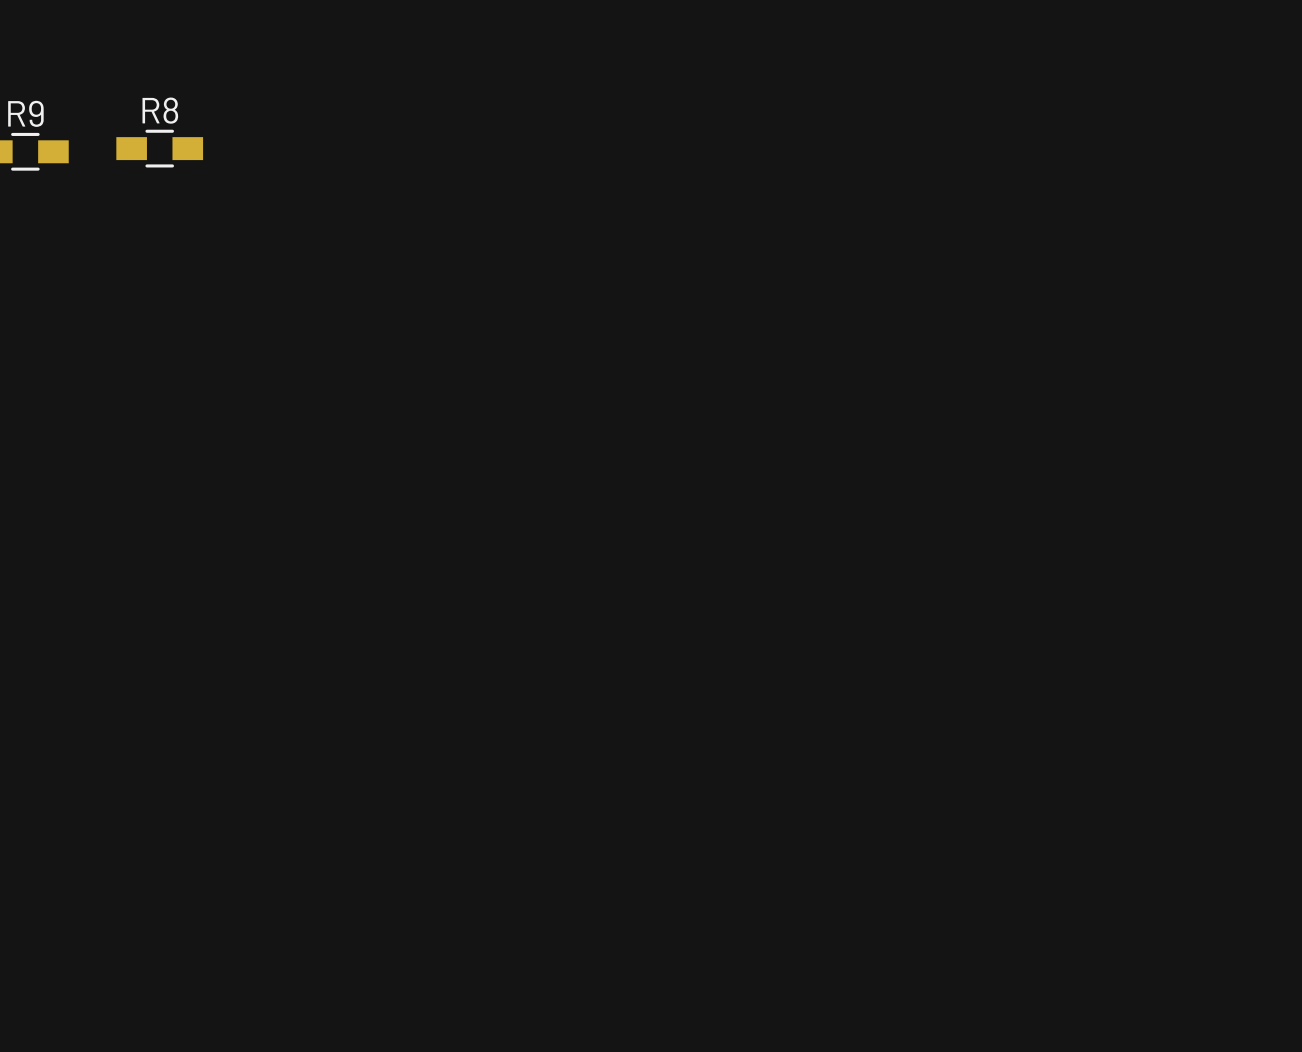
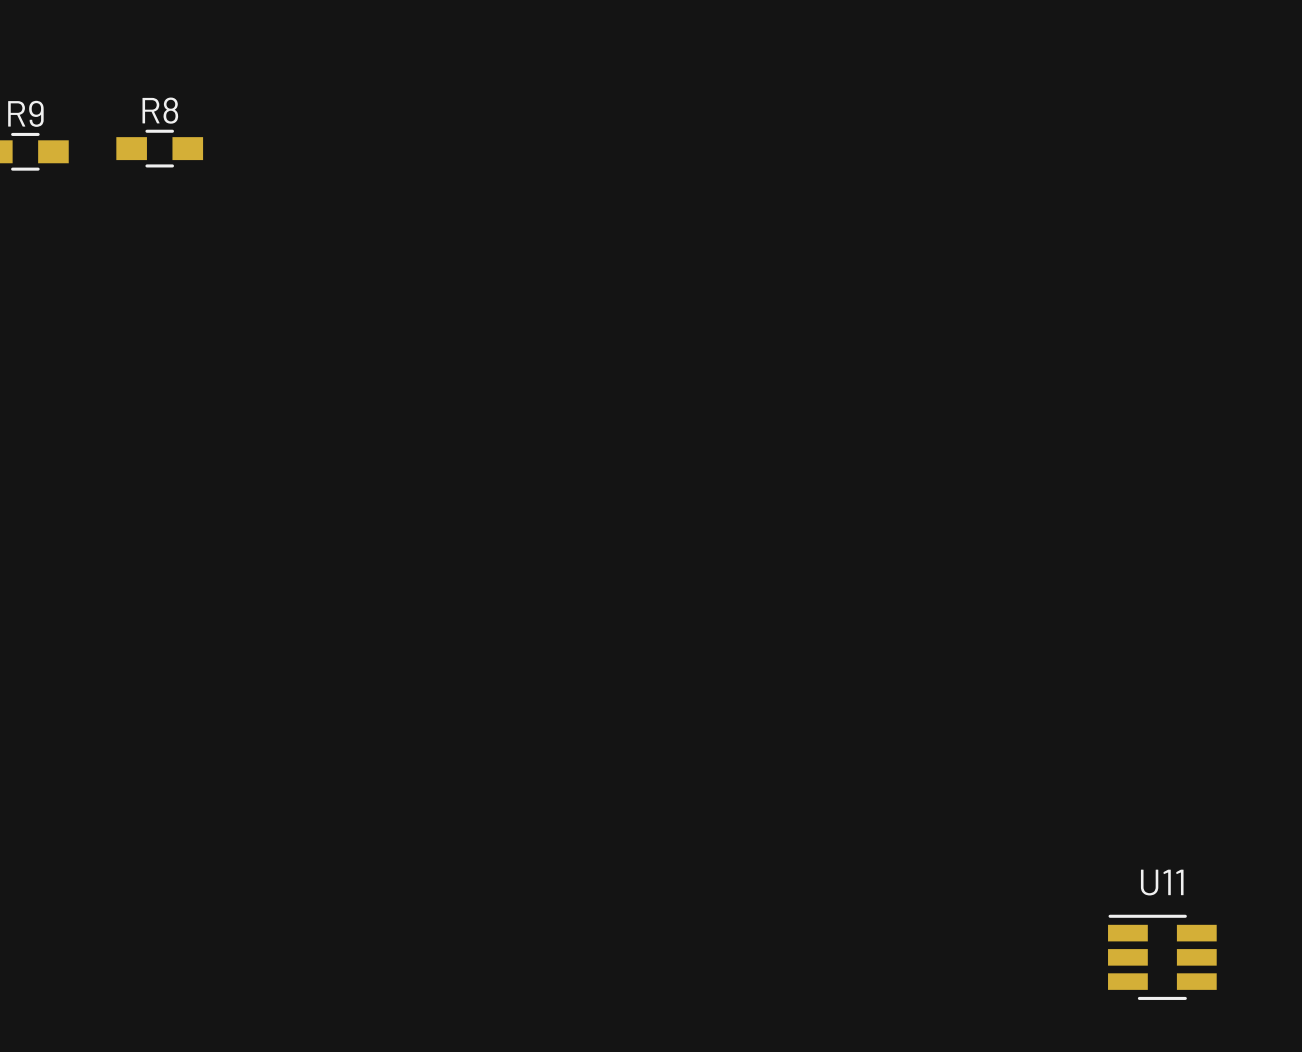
U11: none -> (1162, 957)

